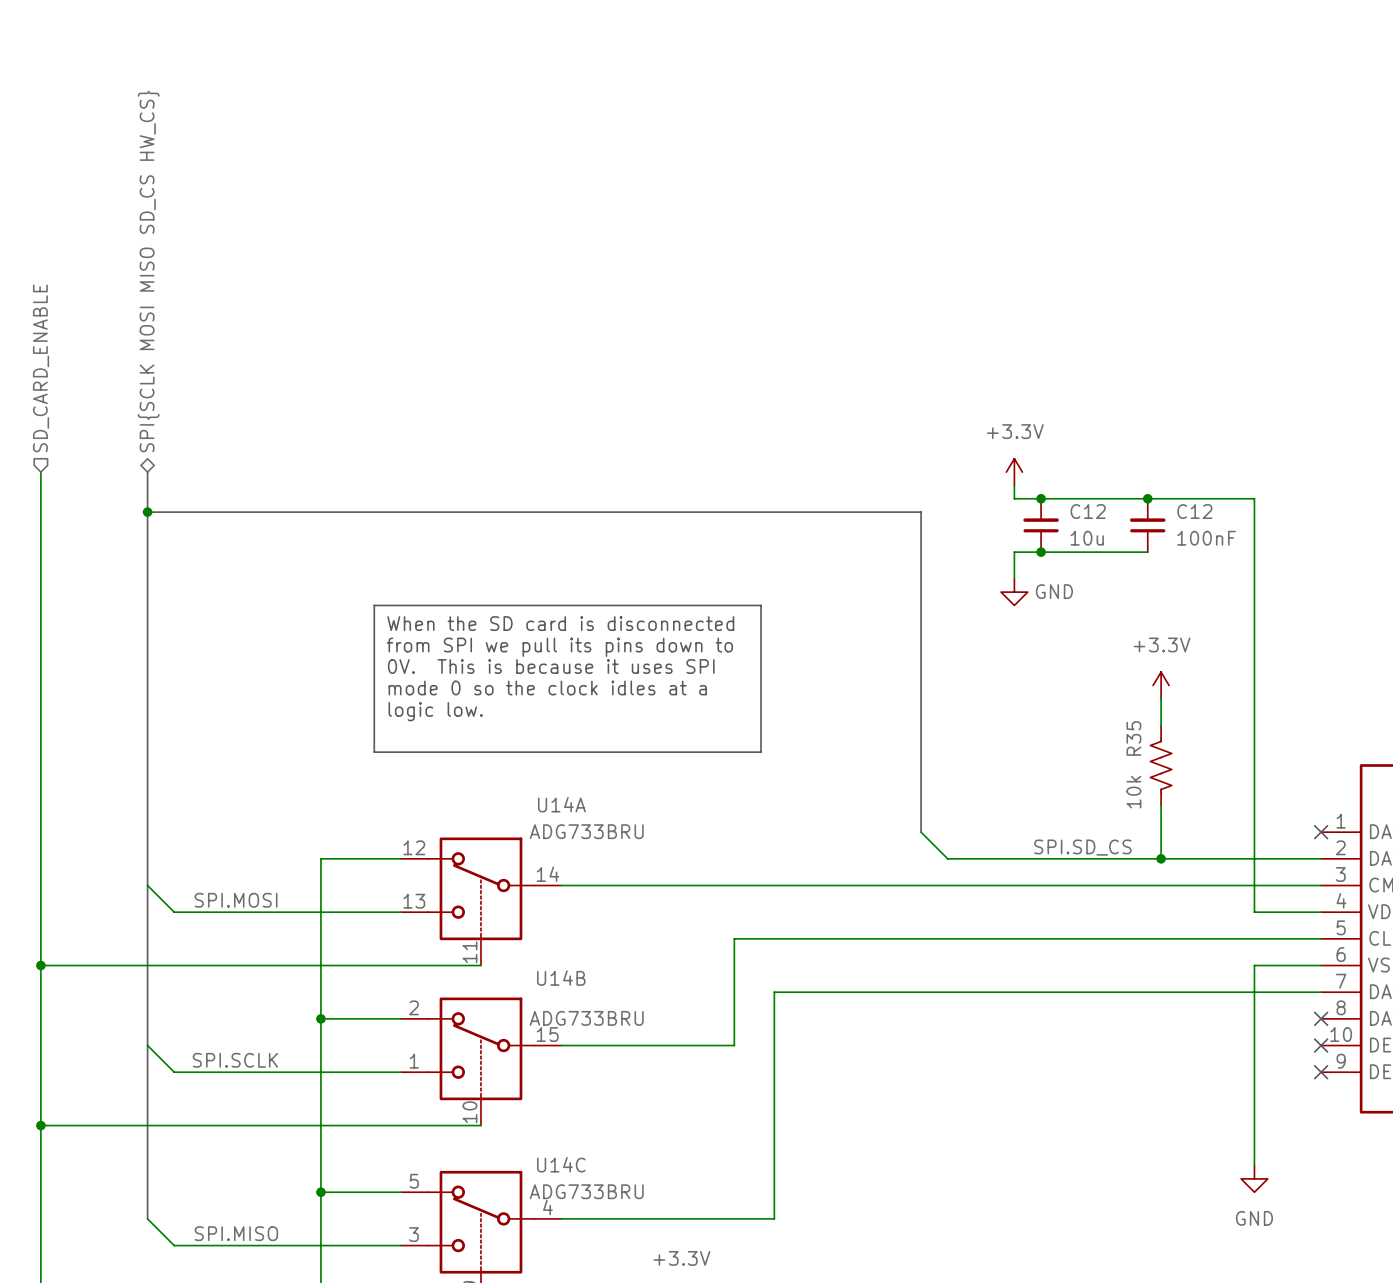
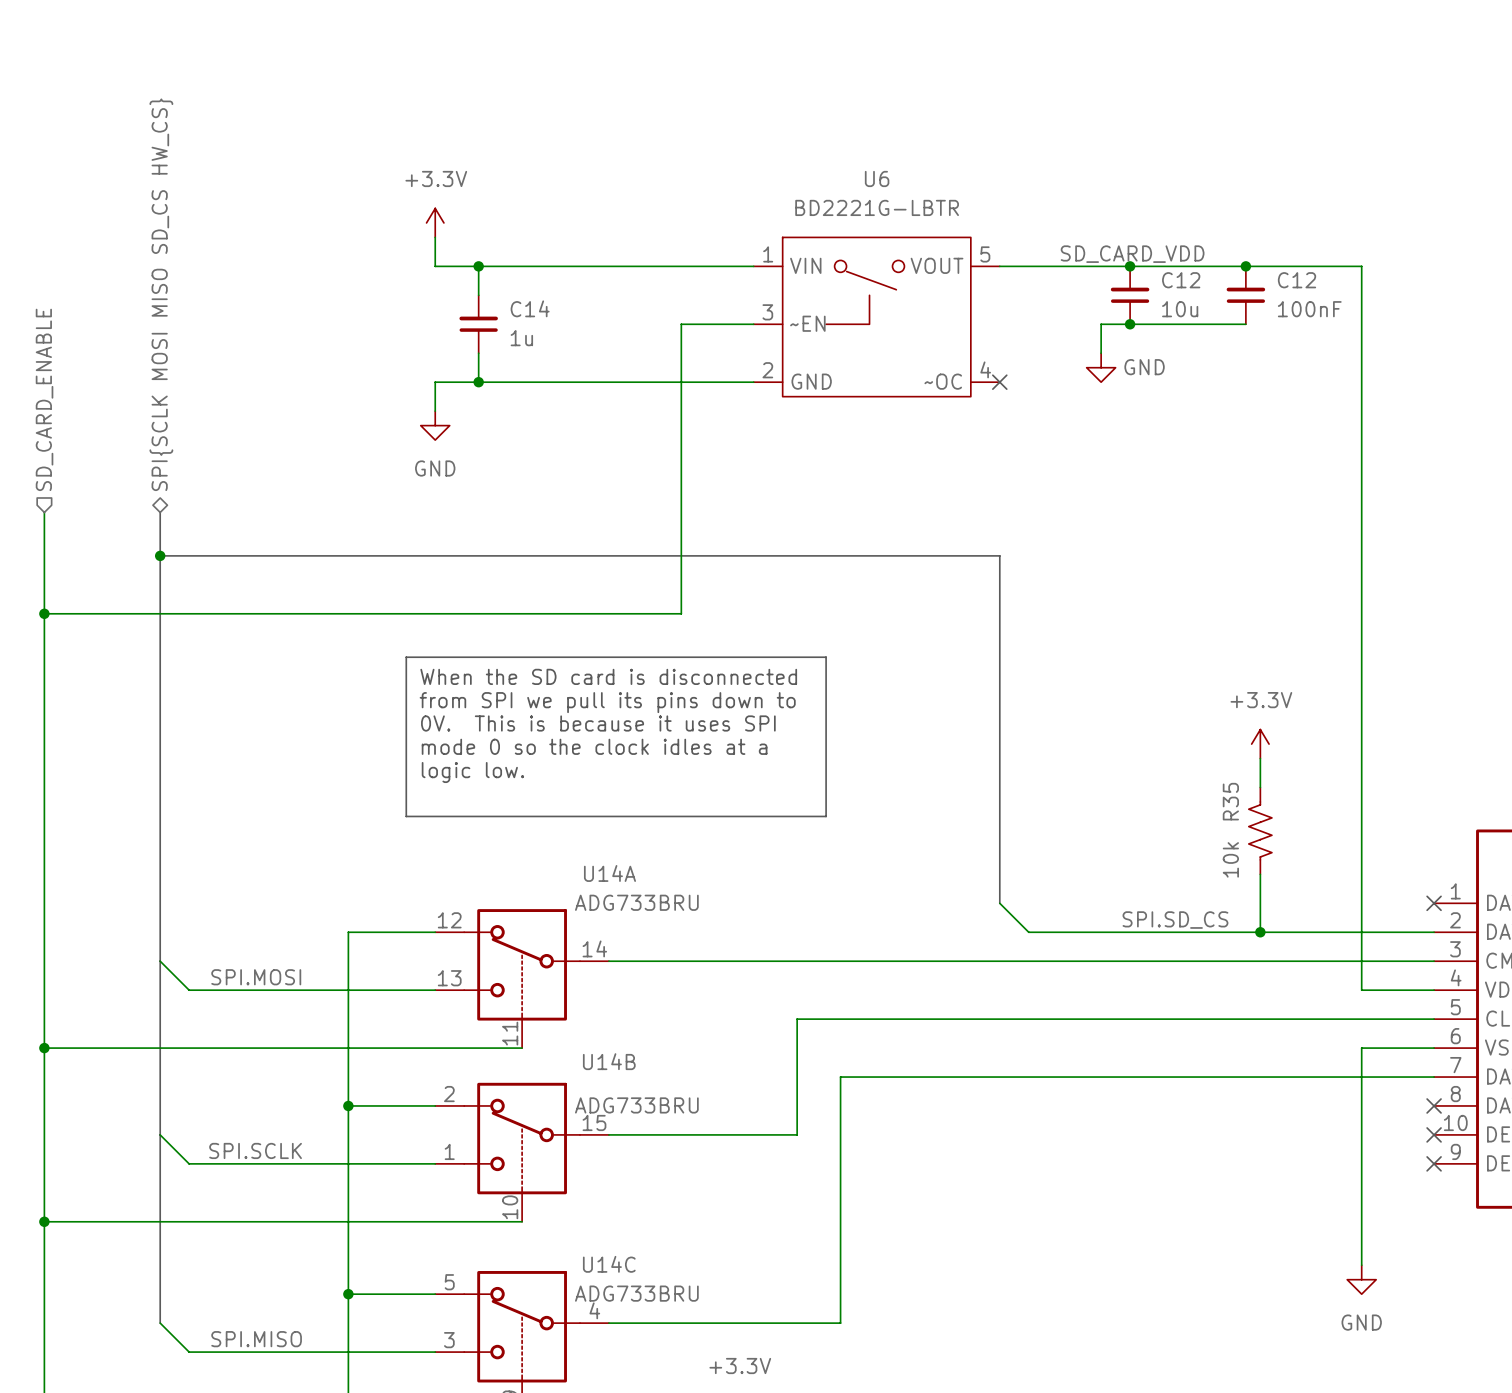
power symbol: none -> +3.3V (435, 222)
wire: none -> (435, 237) (435, 266) (753, 266)
label: none -> SD_CARD_VDD (1132, 254)
wire: none -> (478, 266) (478, 295)
junction: none -> (478, 266)
junction: none -> (1130, 266)
junction: none -> (1245, 266)
U6: none -> BD2221G-LBTR (876, 317)
C14: none -> 1u (478, 324)
wire: none -> (753, 324) (681, 324) (681, 613) (44, 613)
junction: none -> (1130, 324)
wire: none -> (478, 353) (478, 382)
junction: none -> (478, 382)
wire: none -> (753, 382) (435, 382) (435, 411)
no-connect mark: none -> (999, 382)
power symbol: none -> GND (435, 425)
power symbol: +3.3V (1014, 472) -> none
wire: (1014, 485) (1014, 498) (1254, 498) -> (999, 266) (1361, 266) (1361, 541)
junction: (1041, 498) -> none
junction: (1147, 498) -> none
C12 position: (1041, 525) -> (1130, 295)
C12 position: (1147, 525) -> (1245, 295)
junction: (1041, 552) -> none
wire: (1147, 552) (1014, 552) (1014, 578) -> (1245, 324) (1101, 324) (1101, 353)
junction: none -> (44, 613)
power symbol position: GND (1014, 592) -> GND (1101, 367)

